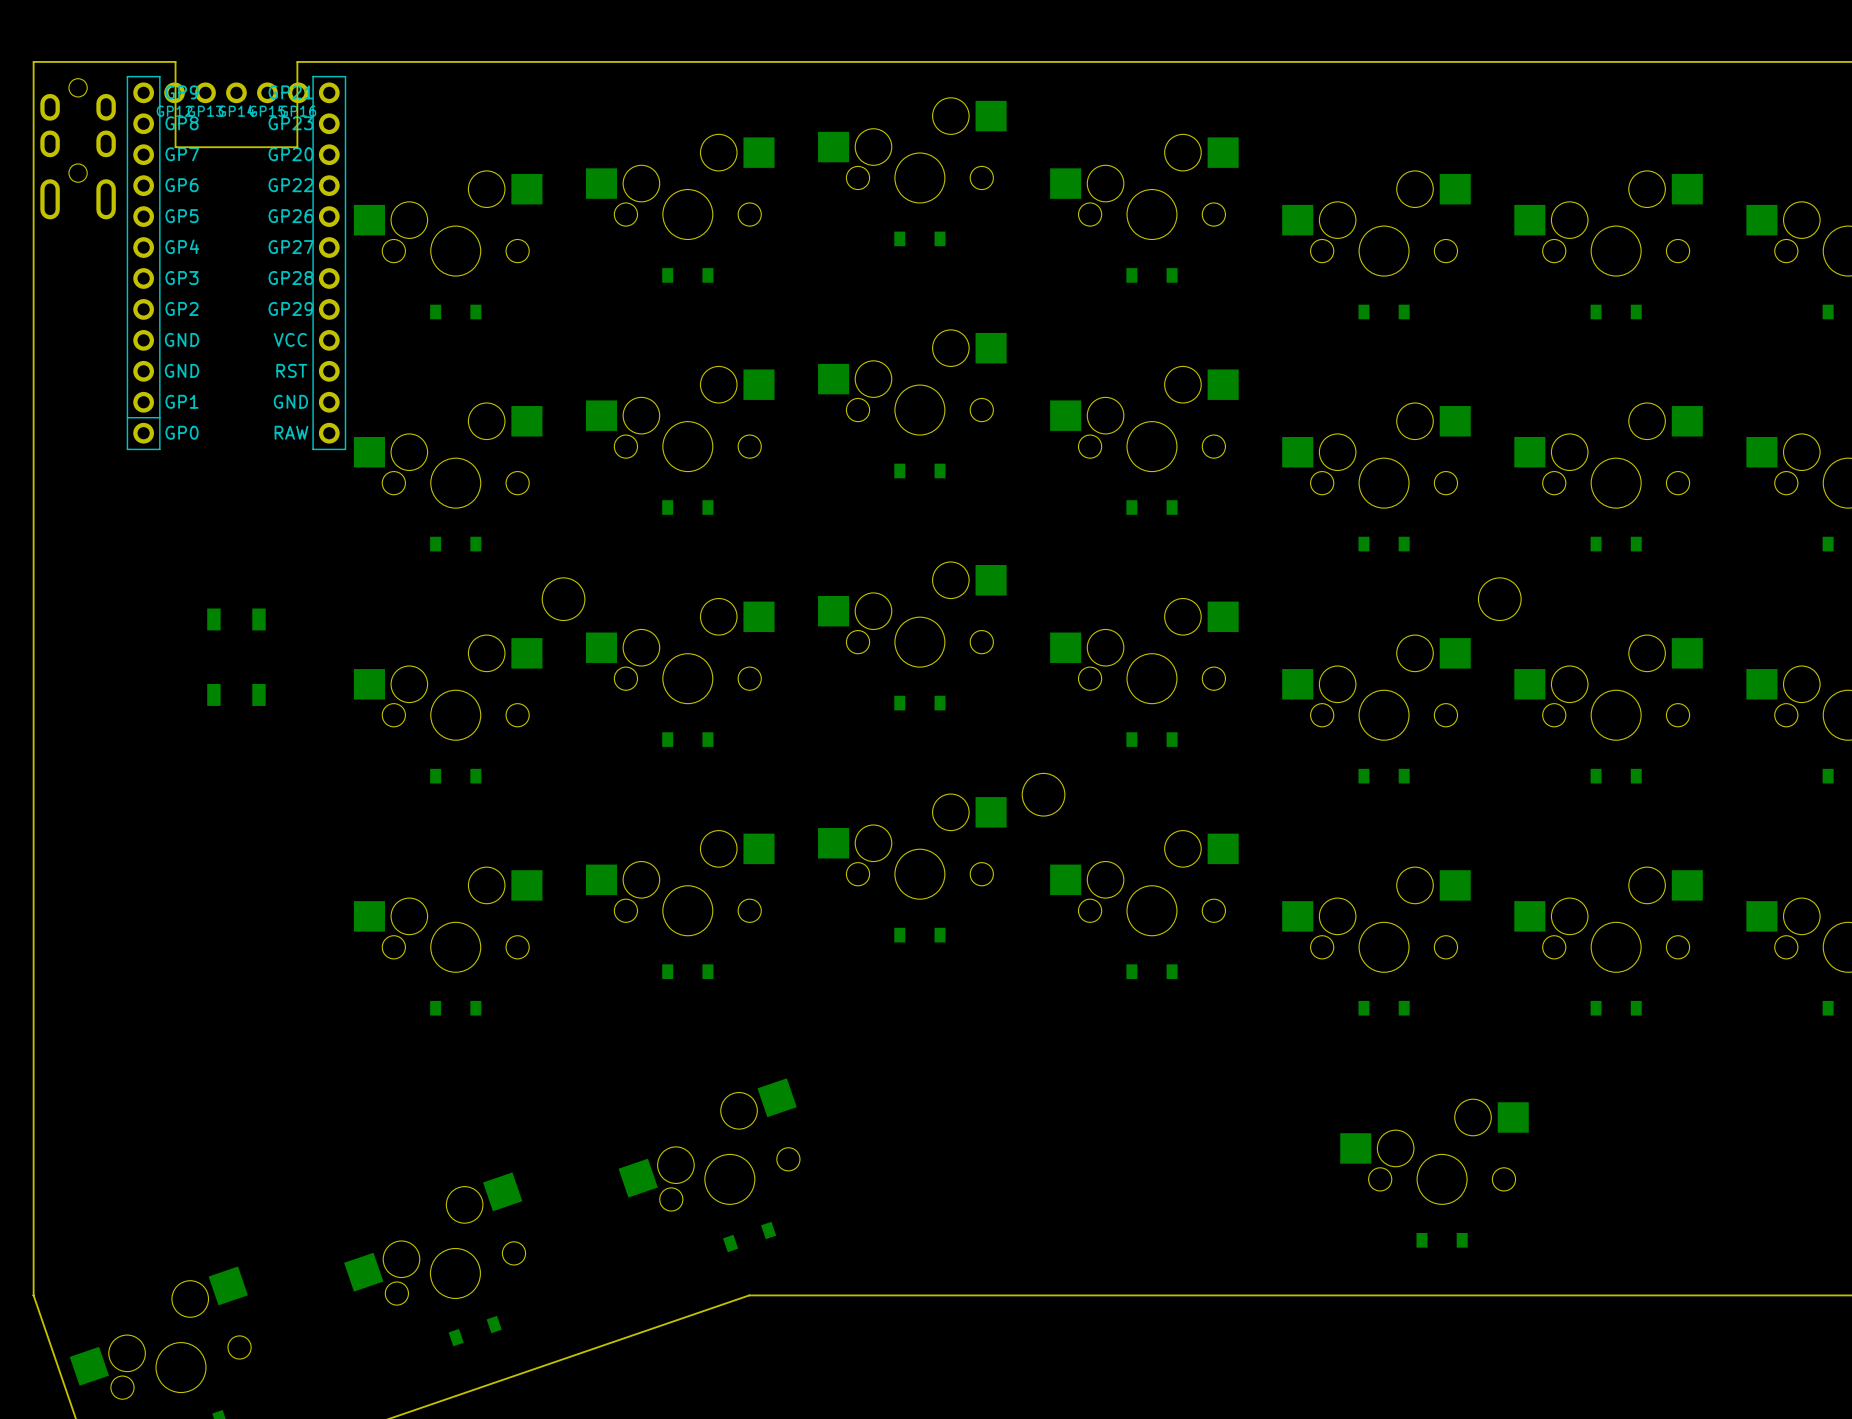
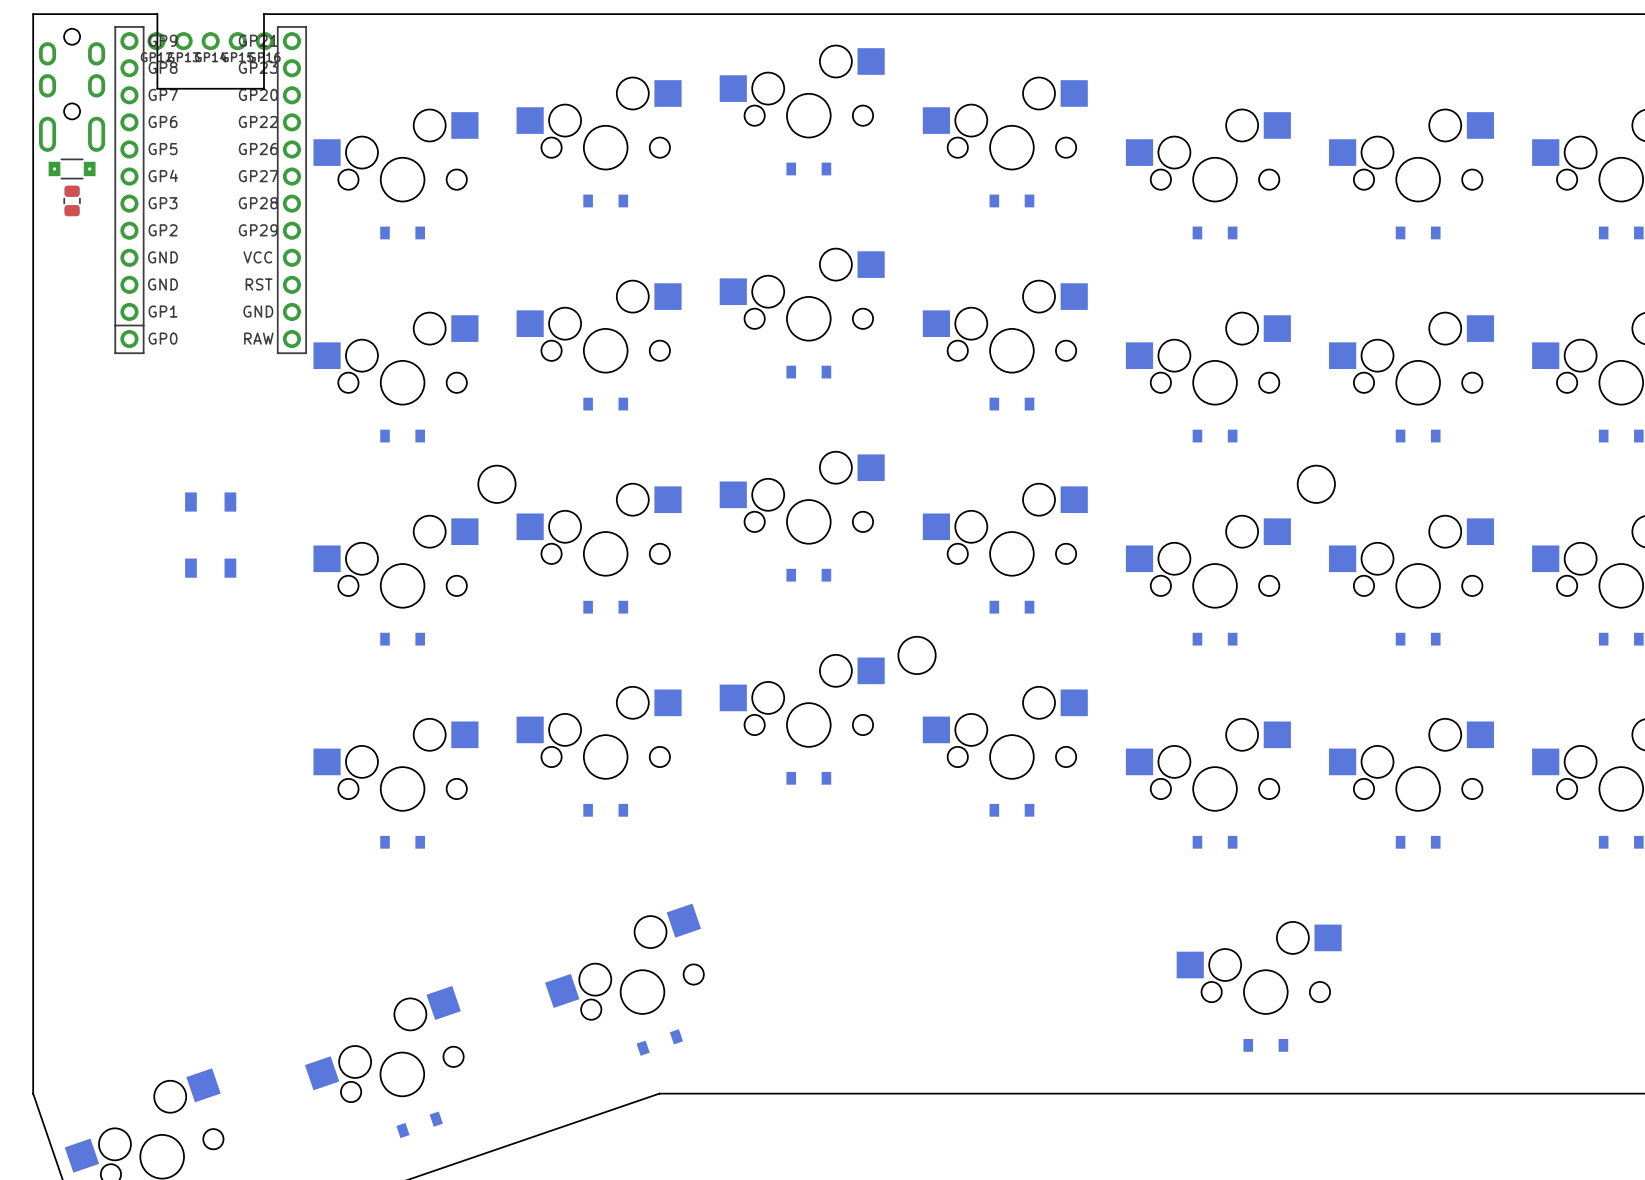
part: none -> (72, 168)
part: none -> (72, 200)

